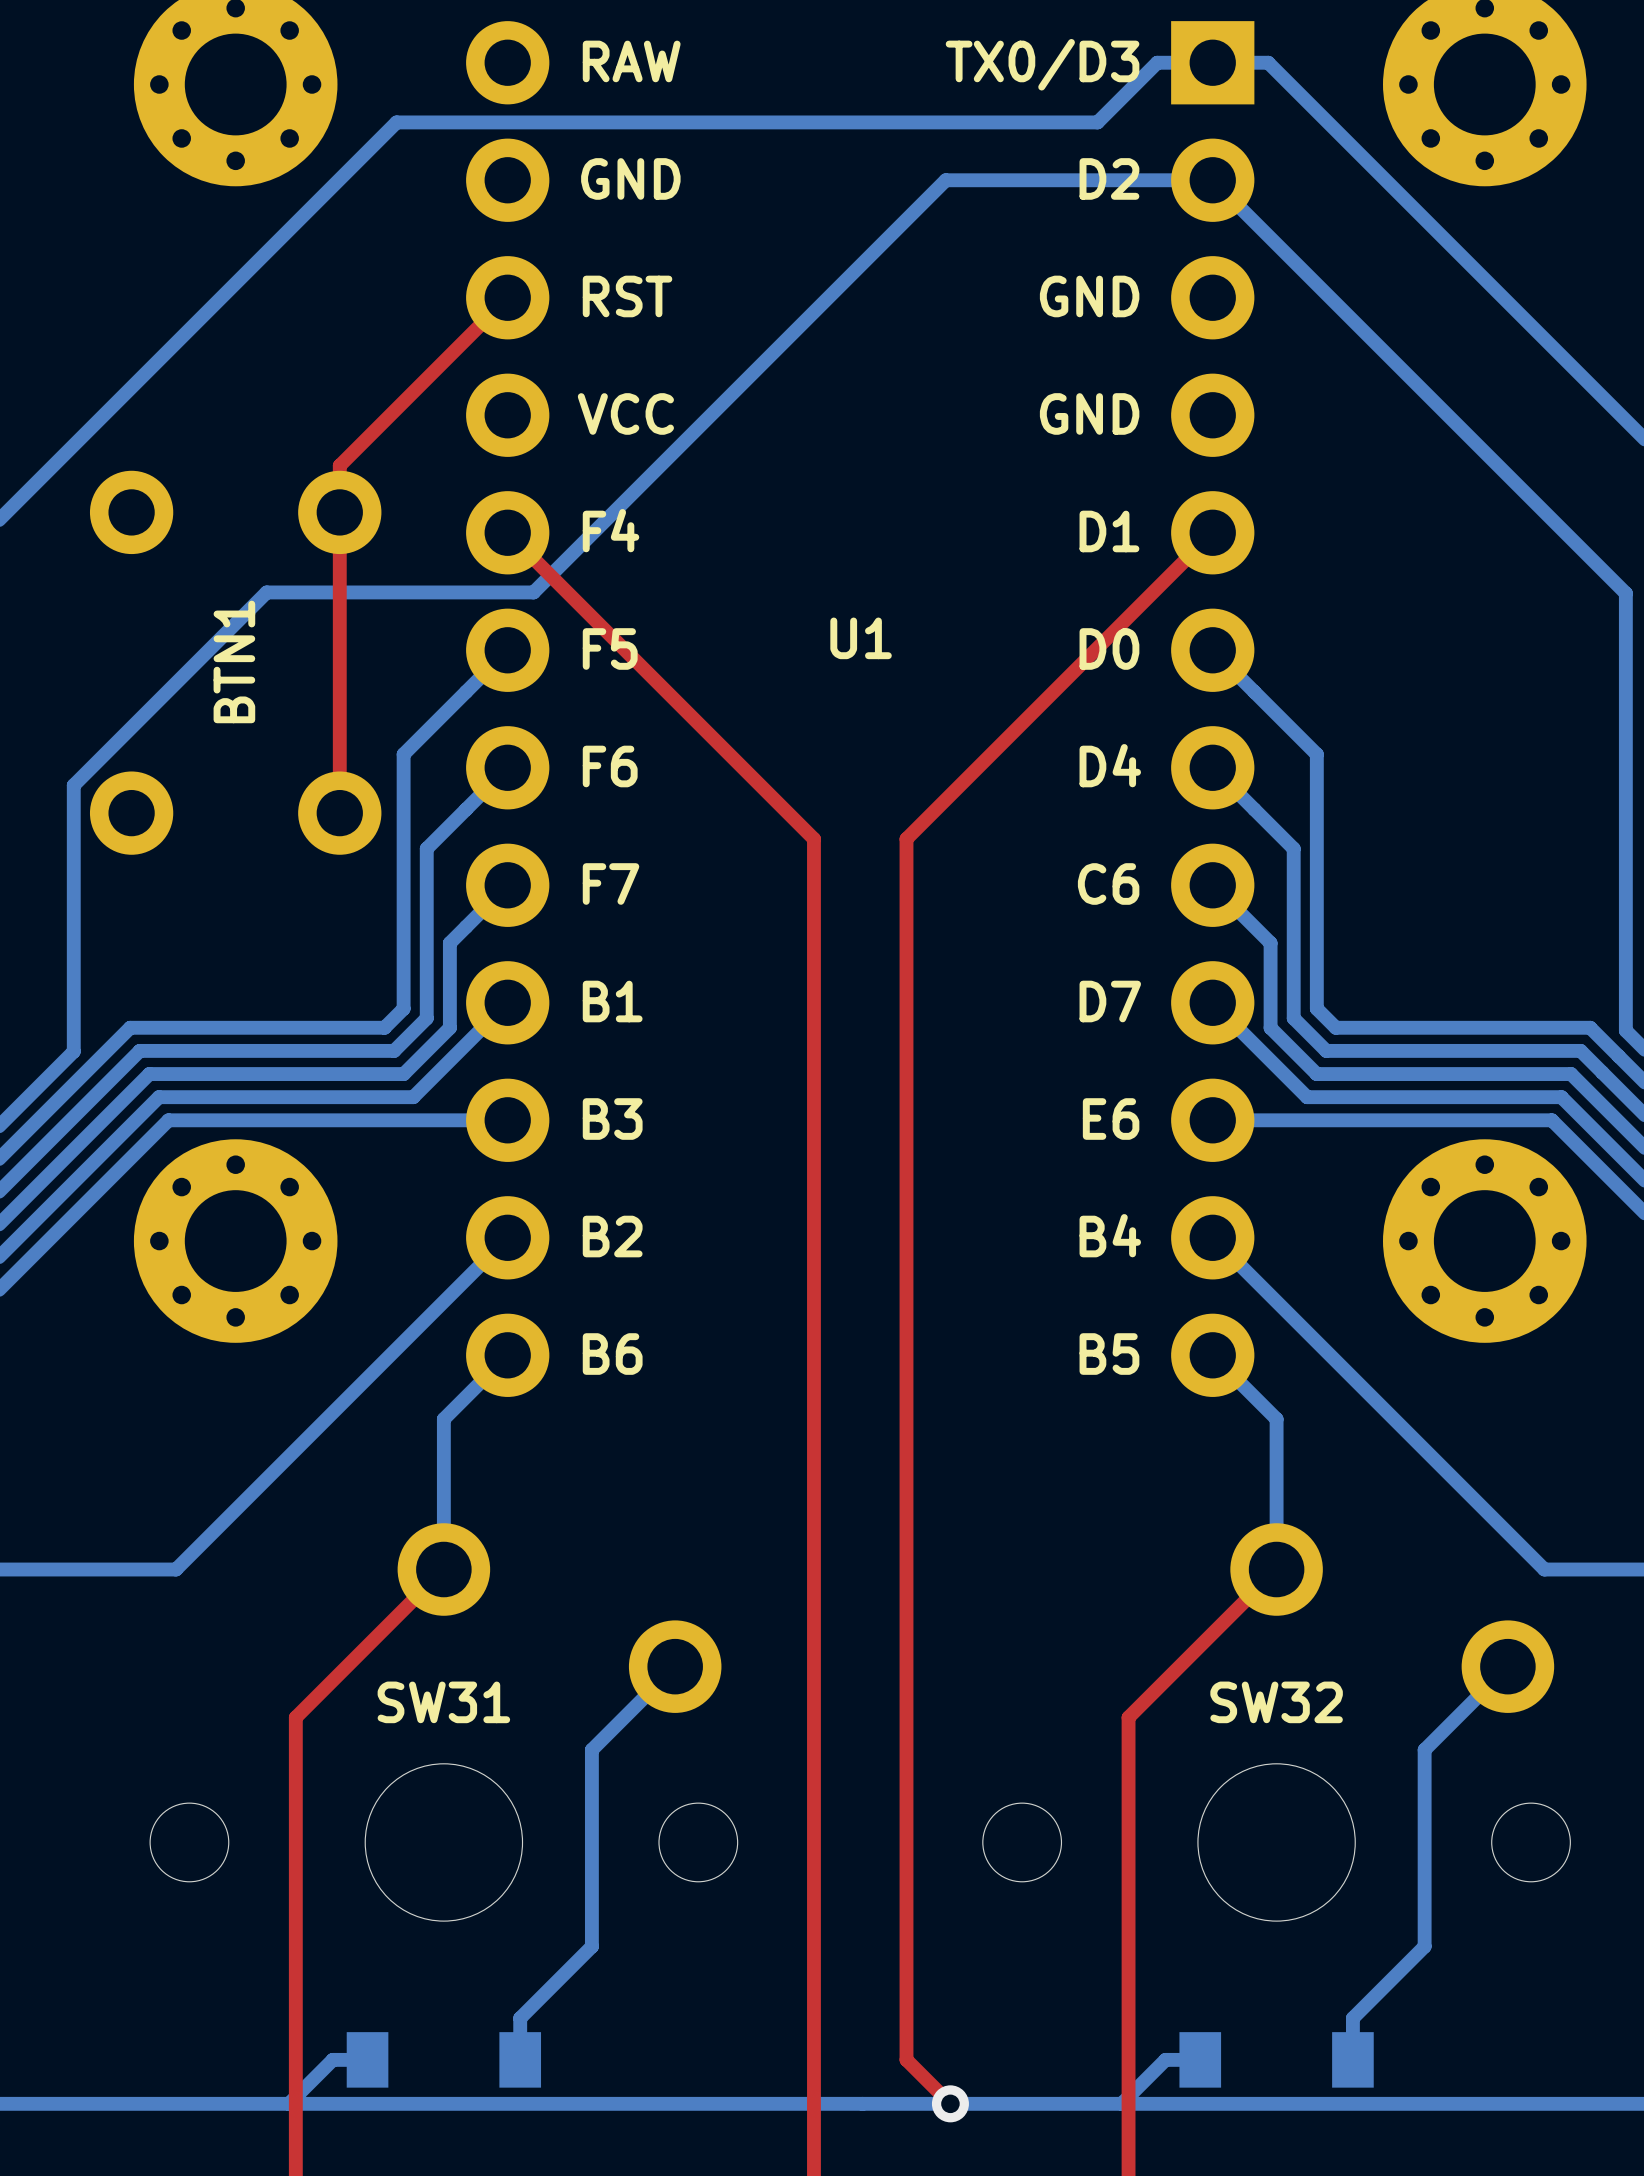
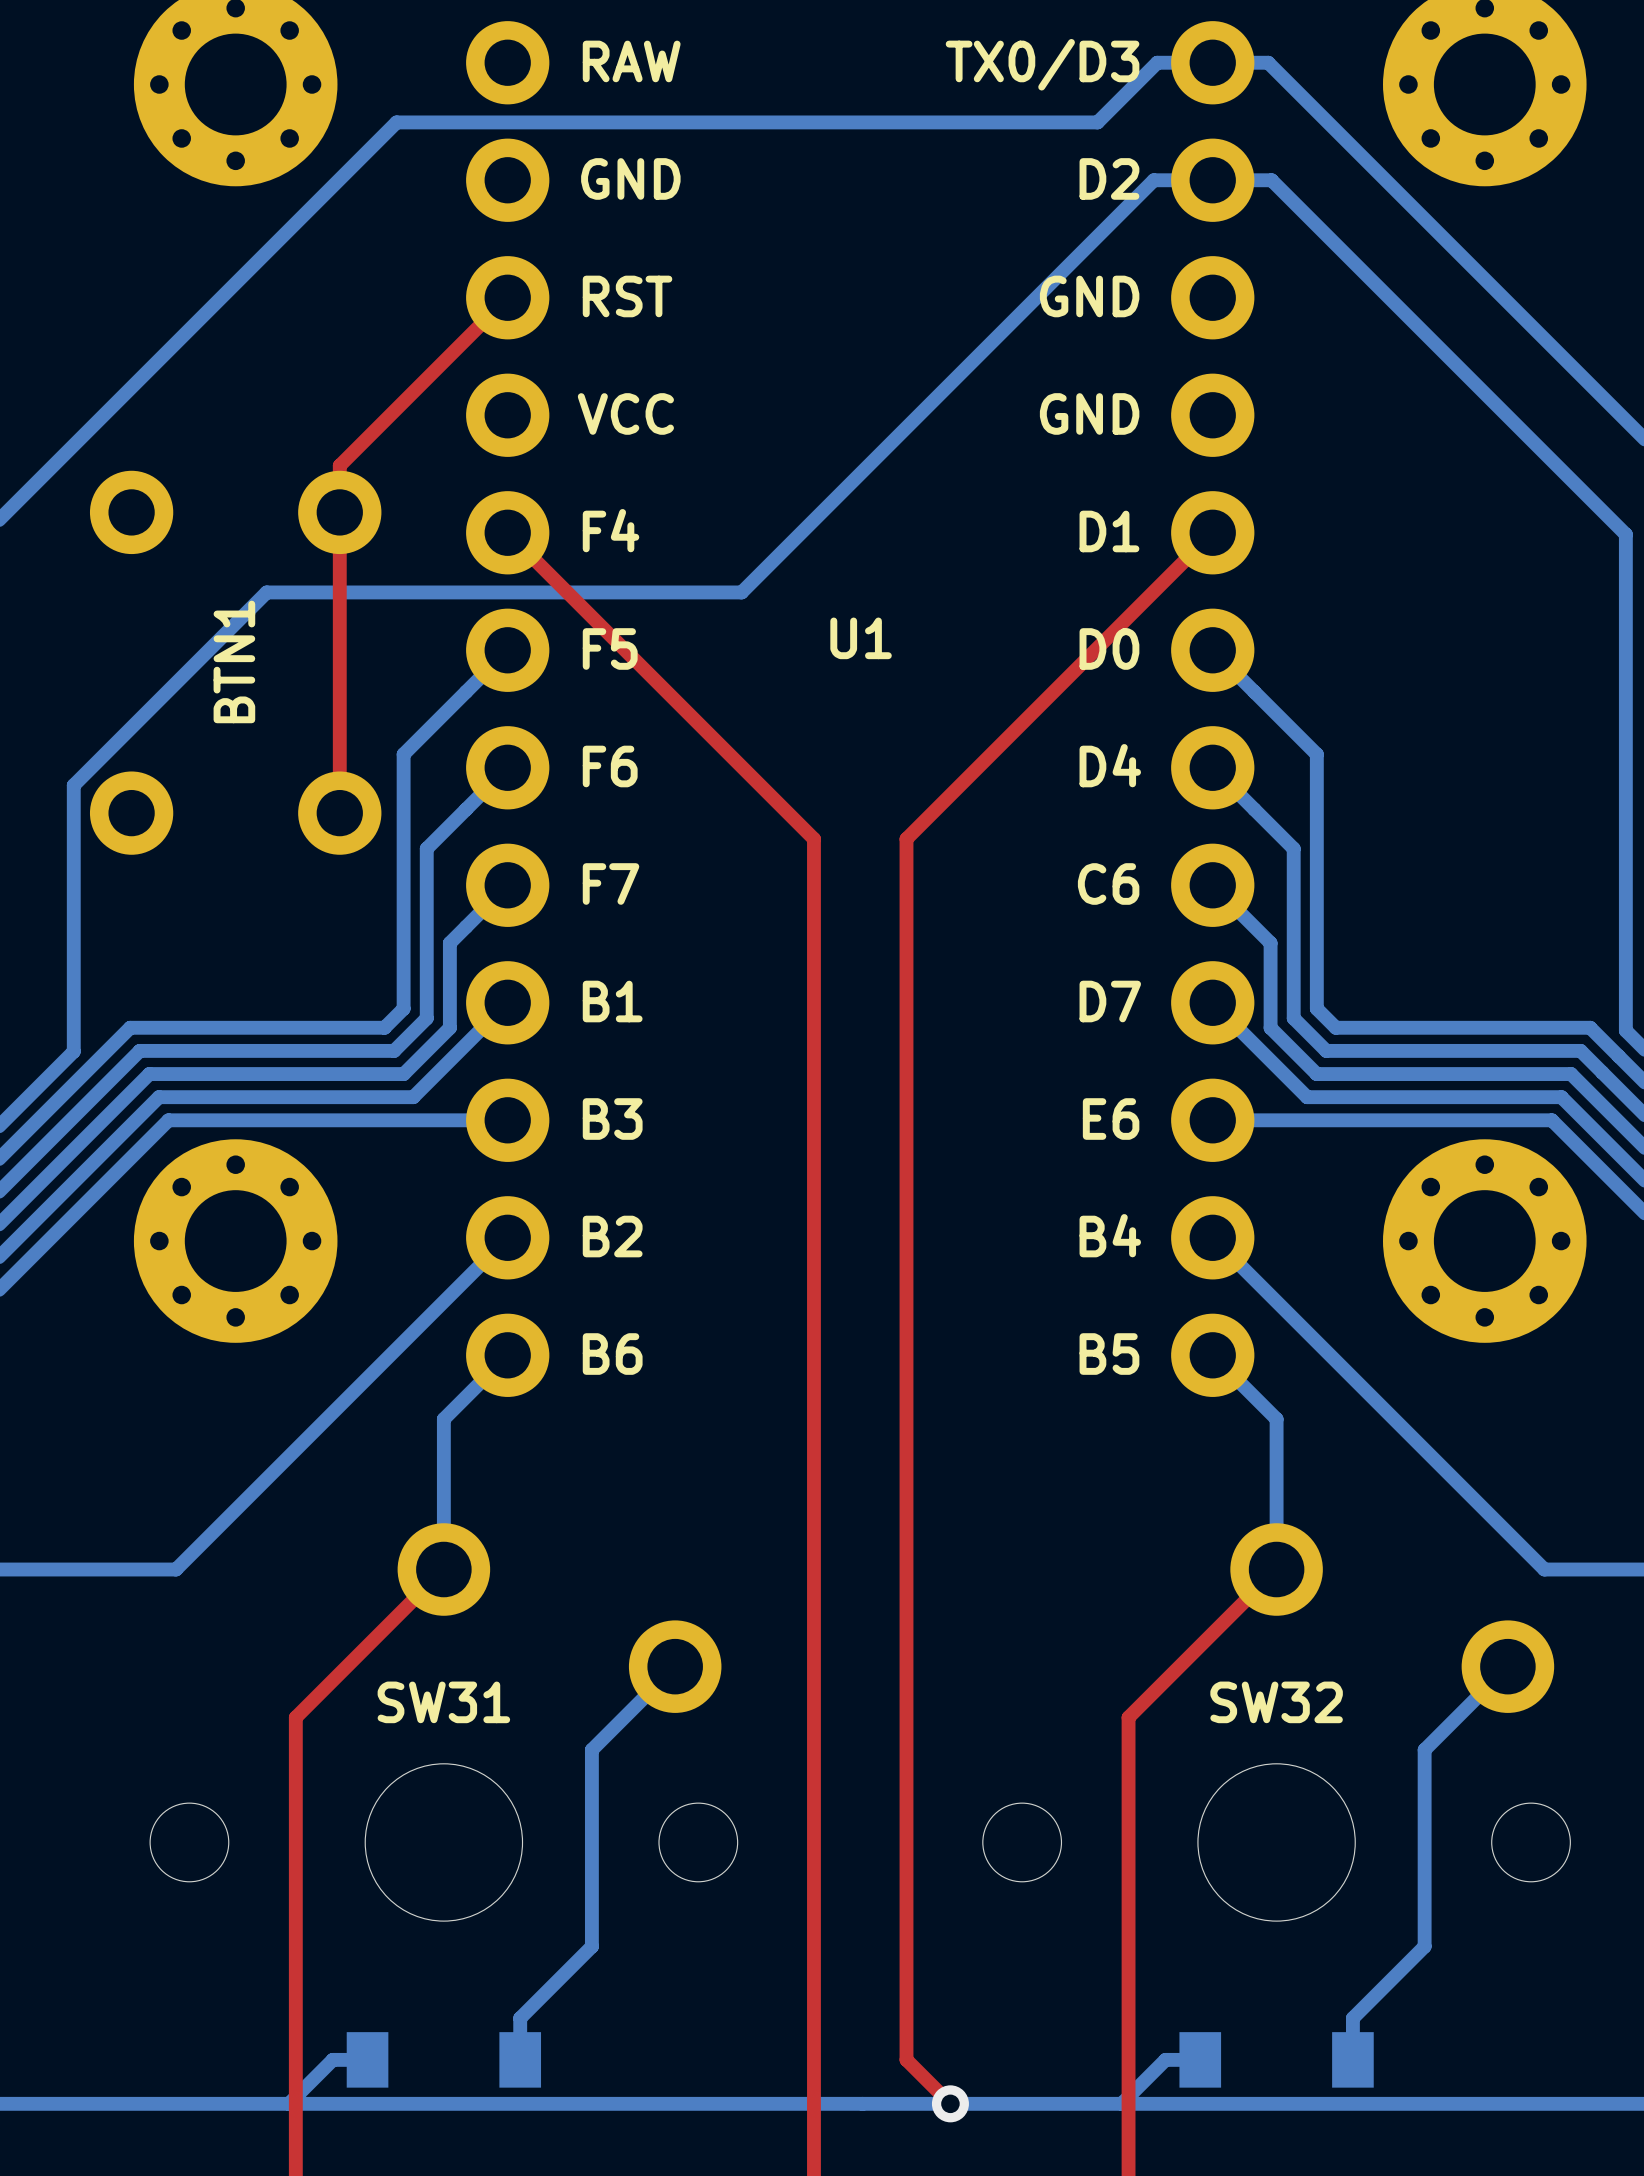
U1 footprint: [466, 21, 1255, 1397] -> [466, 21, 1255, 1397]
bottom track: (1153, 180) (945, 180) (533, 592) -> (1153, 180) (741, 592) (533, 592)
bottom track: (1212, 180) (1625, 593) -> (1212, 180) (1271, 180) (1625, 534) (1625, 593)

